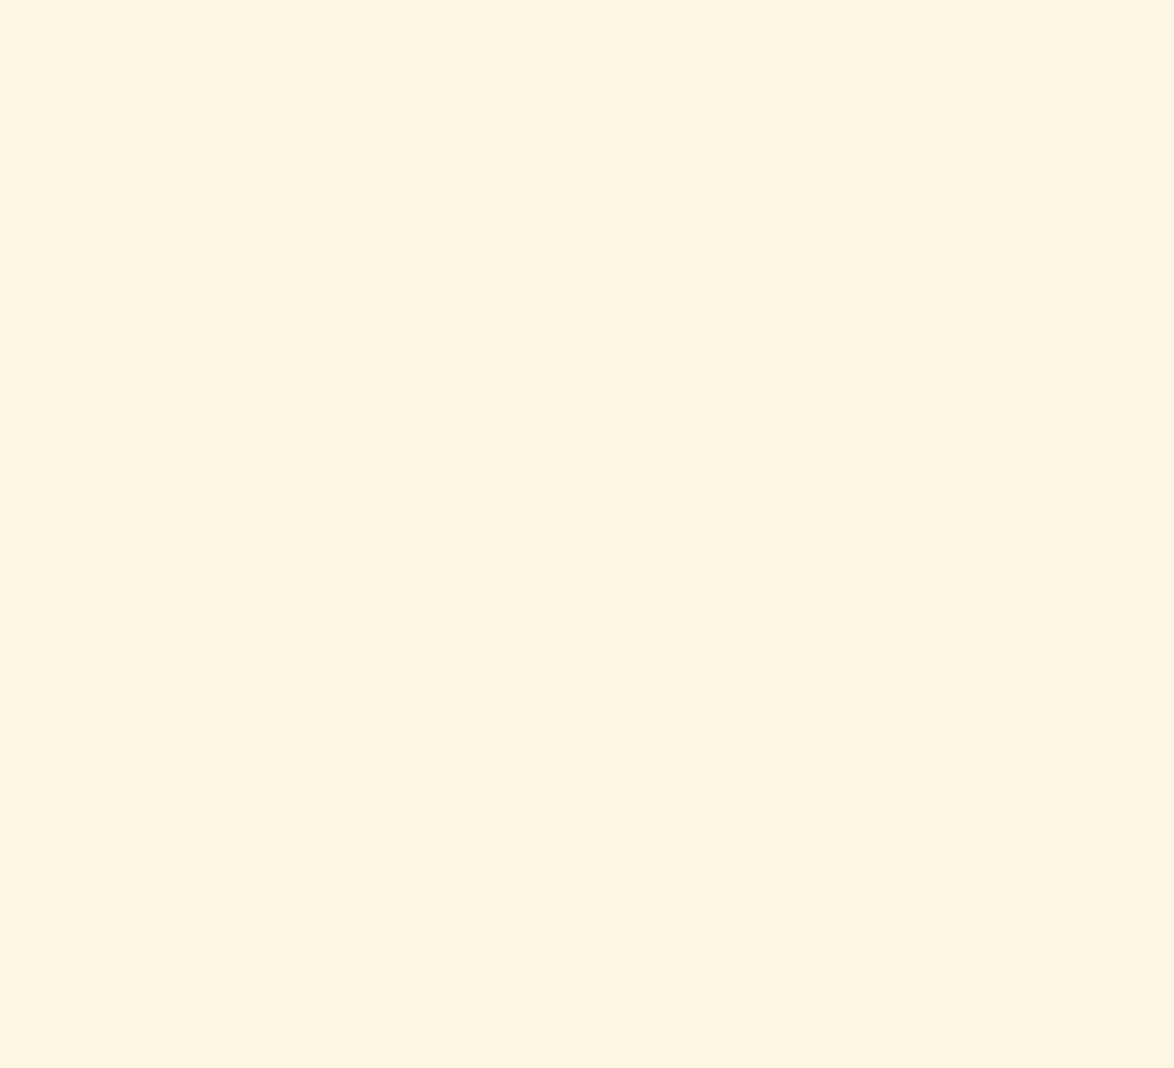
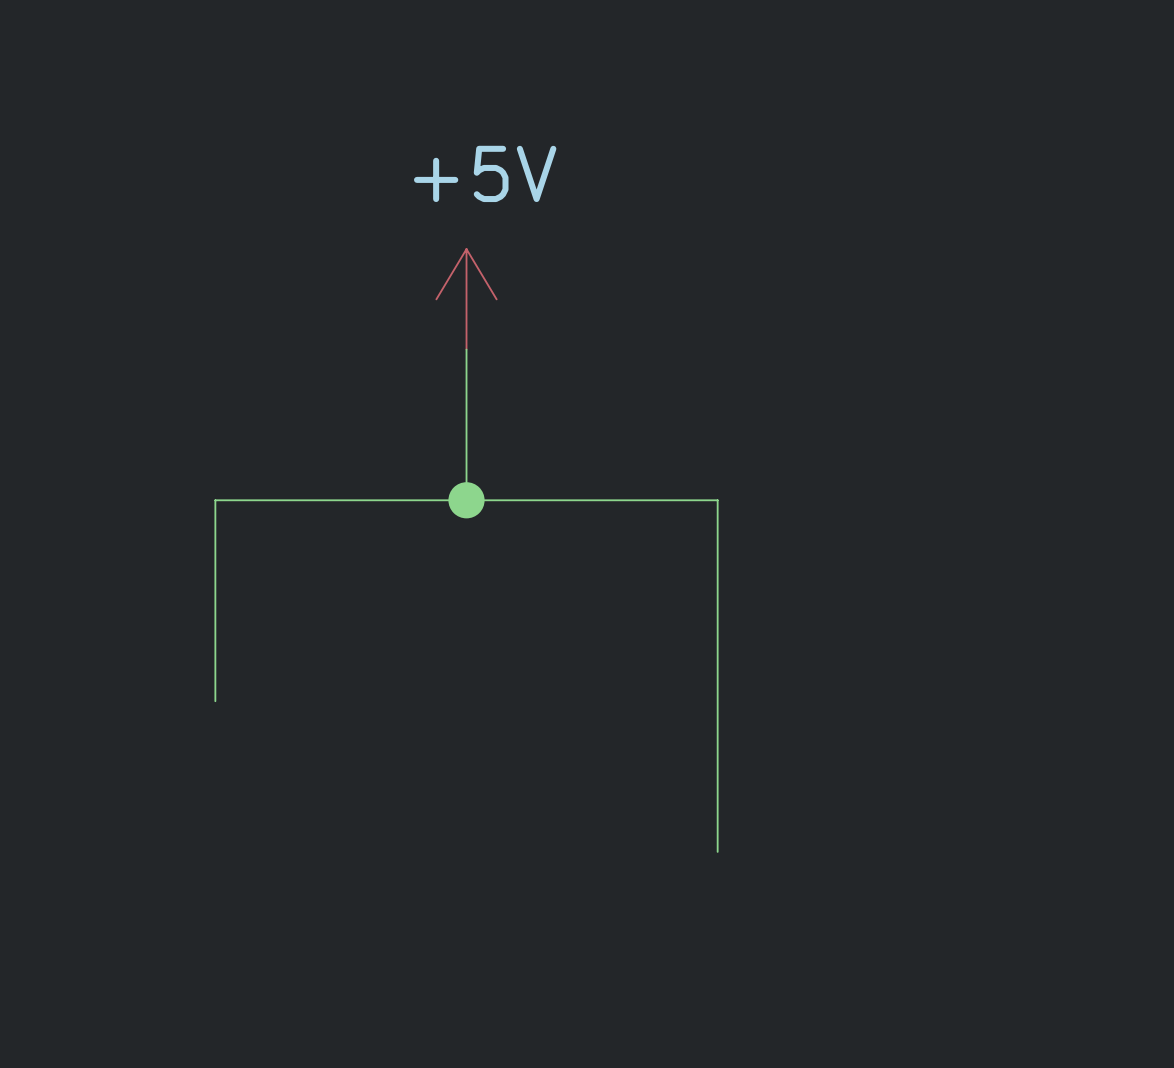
power symbol: none -> +5V (466, 299)
wire: none -> (466, 349) (466, 500)
junction: none -> (466, 500)
wire: none -> (215, 701) (215, 500) (717, 500) (717, 851)

